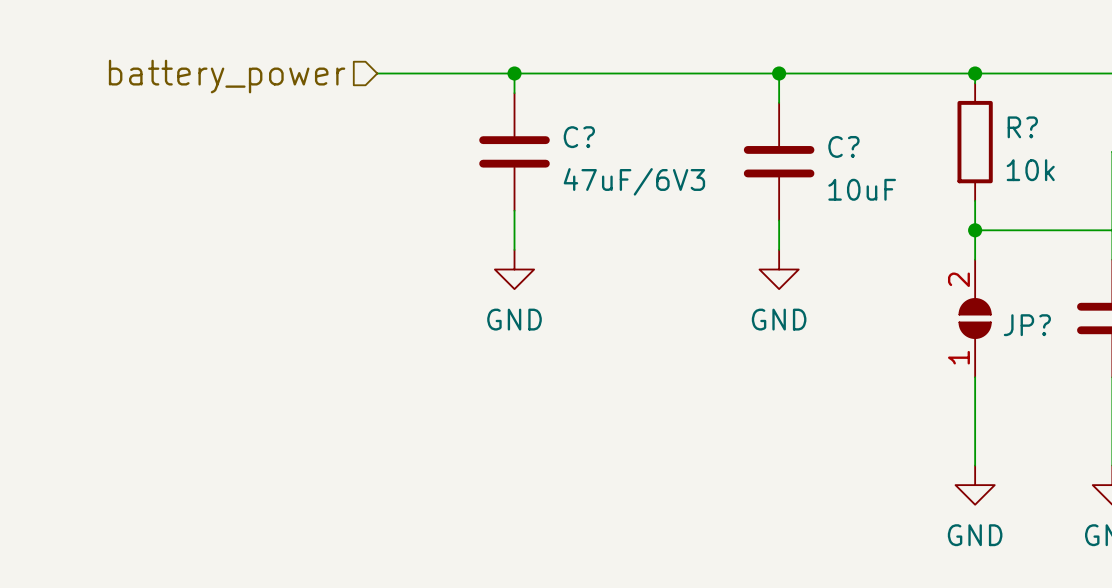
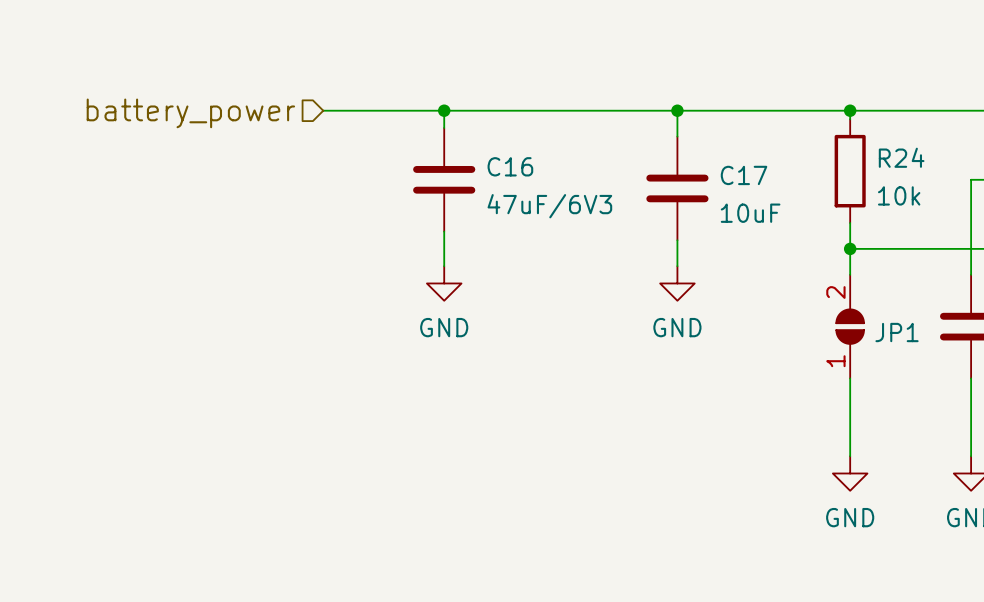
R? name: R? (1022, 127) -> R24 (901, 157)
C? name: C? (579, 137) -> C16 (510, 166)
C? name: C? (843, 146) -> C17 (744, 175)
JP? name: JP? (1027, 325) -> JP1 (897, 332)

